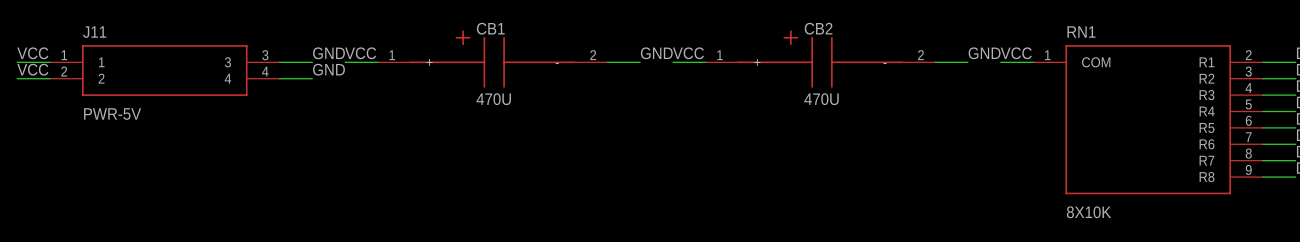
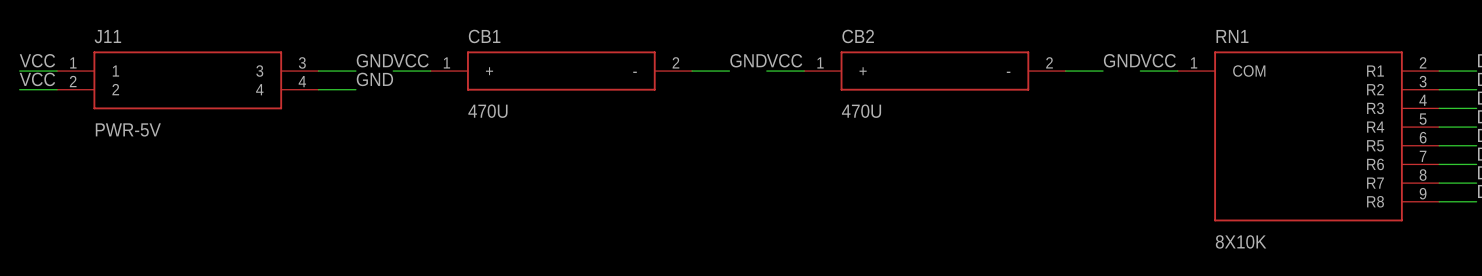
CB1 name position: CB1 (490, 28) -> CB1 (484, 36)
CB2 name position: CB2 (818, 28) -> CB2 (858, 36)
CB1 symbol: [377, 30, 608, 88] -> [430, 51, 693, 91]
CB2 symbol: [705, 30, 936, 88] -> [804, 51, 1066, 91]
CB1 value position: 470U (493, 99) -> 470U (487, 111)
CB2 value position: 470U (821, 99) -> 470U (861, 111)

